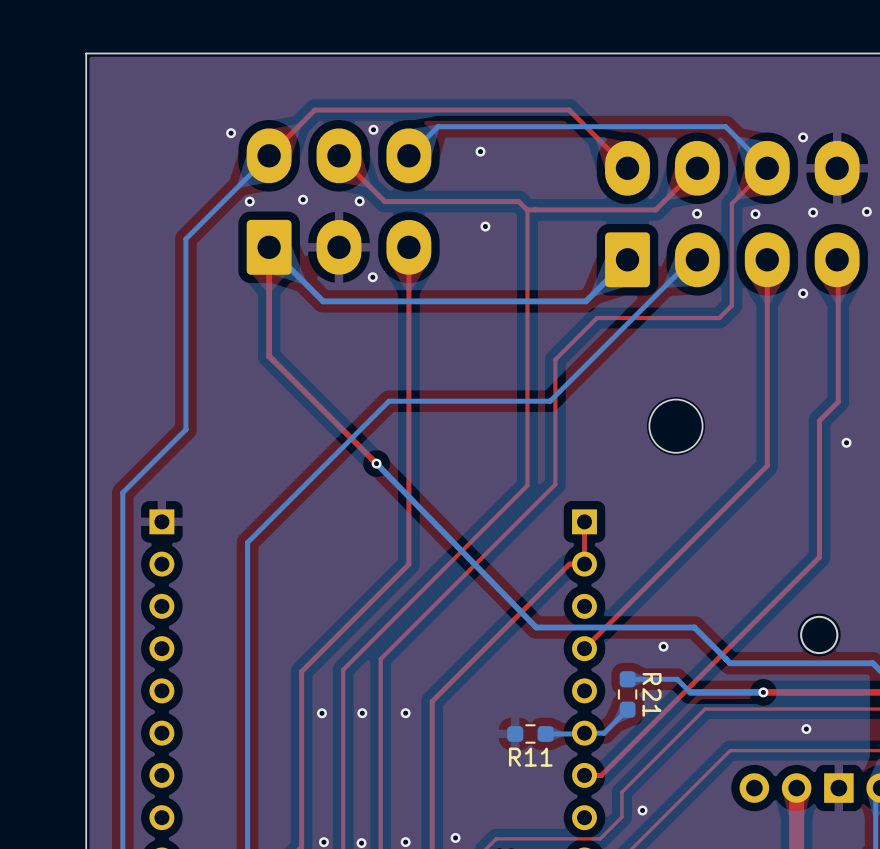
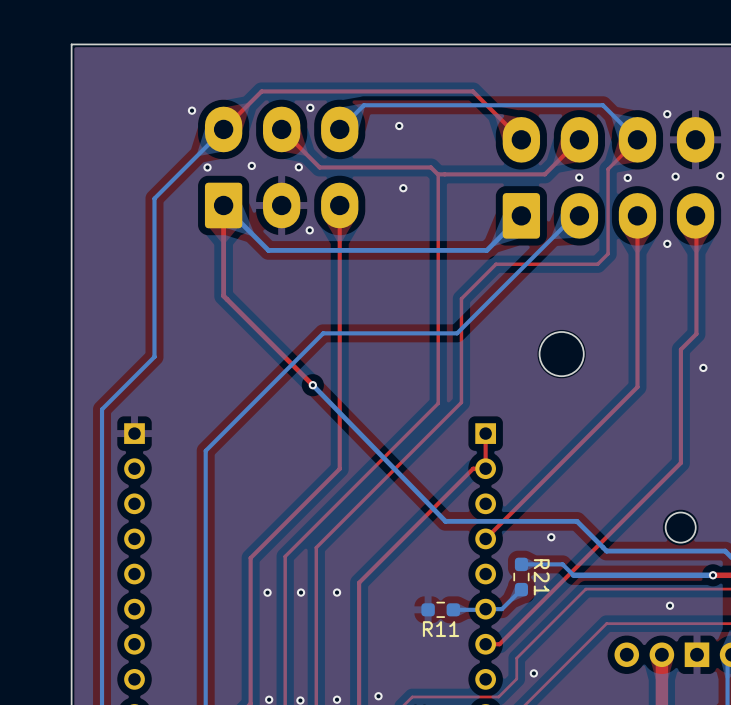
via position: (763, 692) -> (713, 575)
top track: (858, 692) (763, 692) -> none
bottom track: none -> (713, 575) (634, 575)

